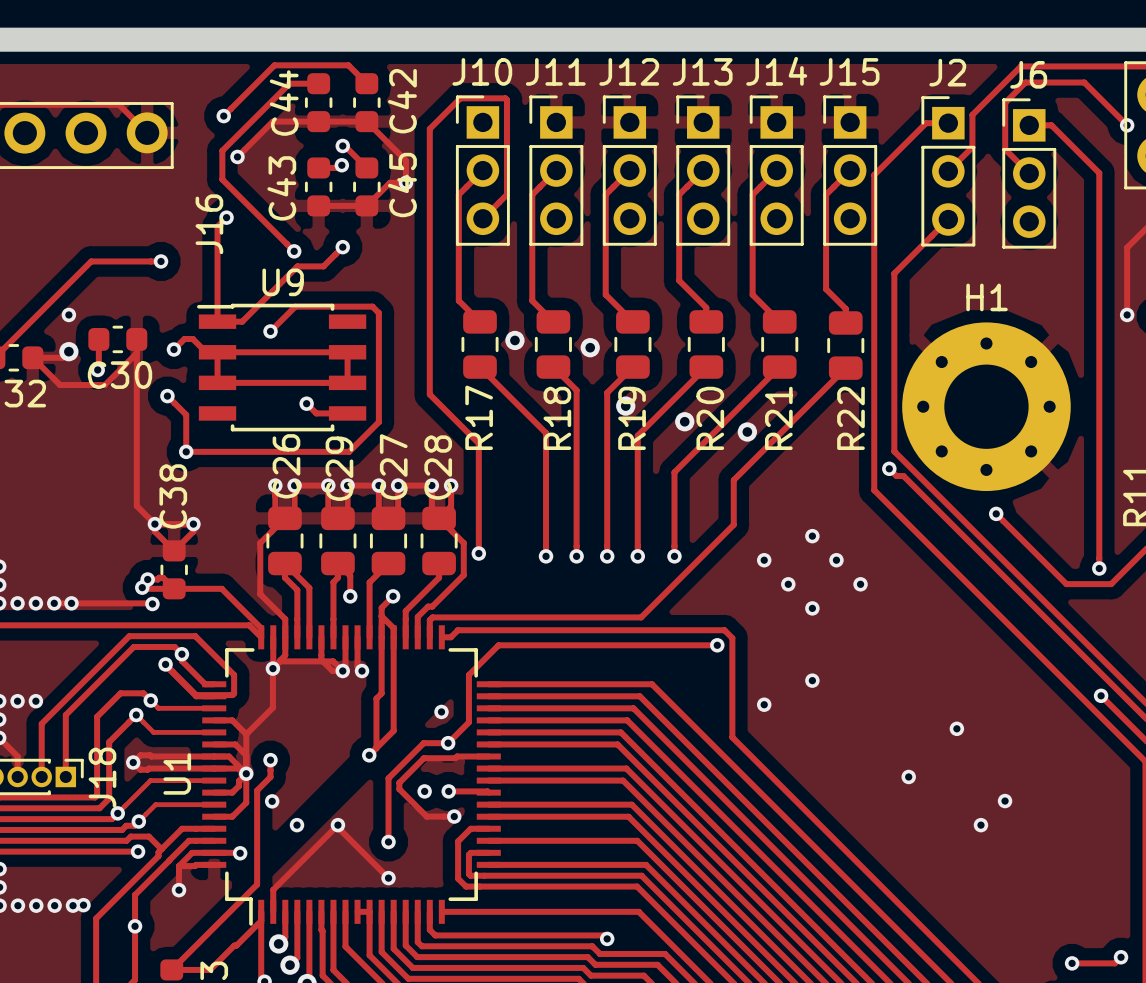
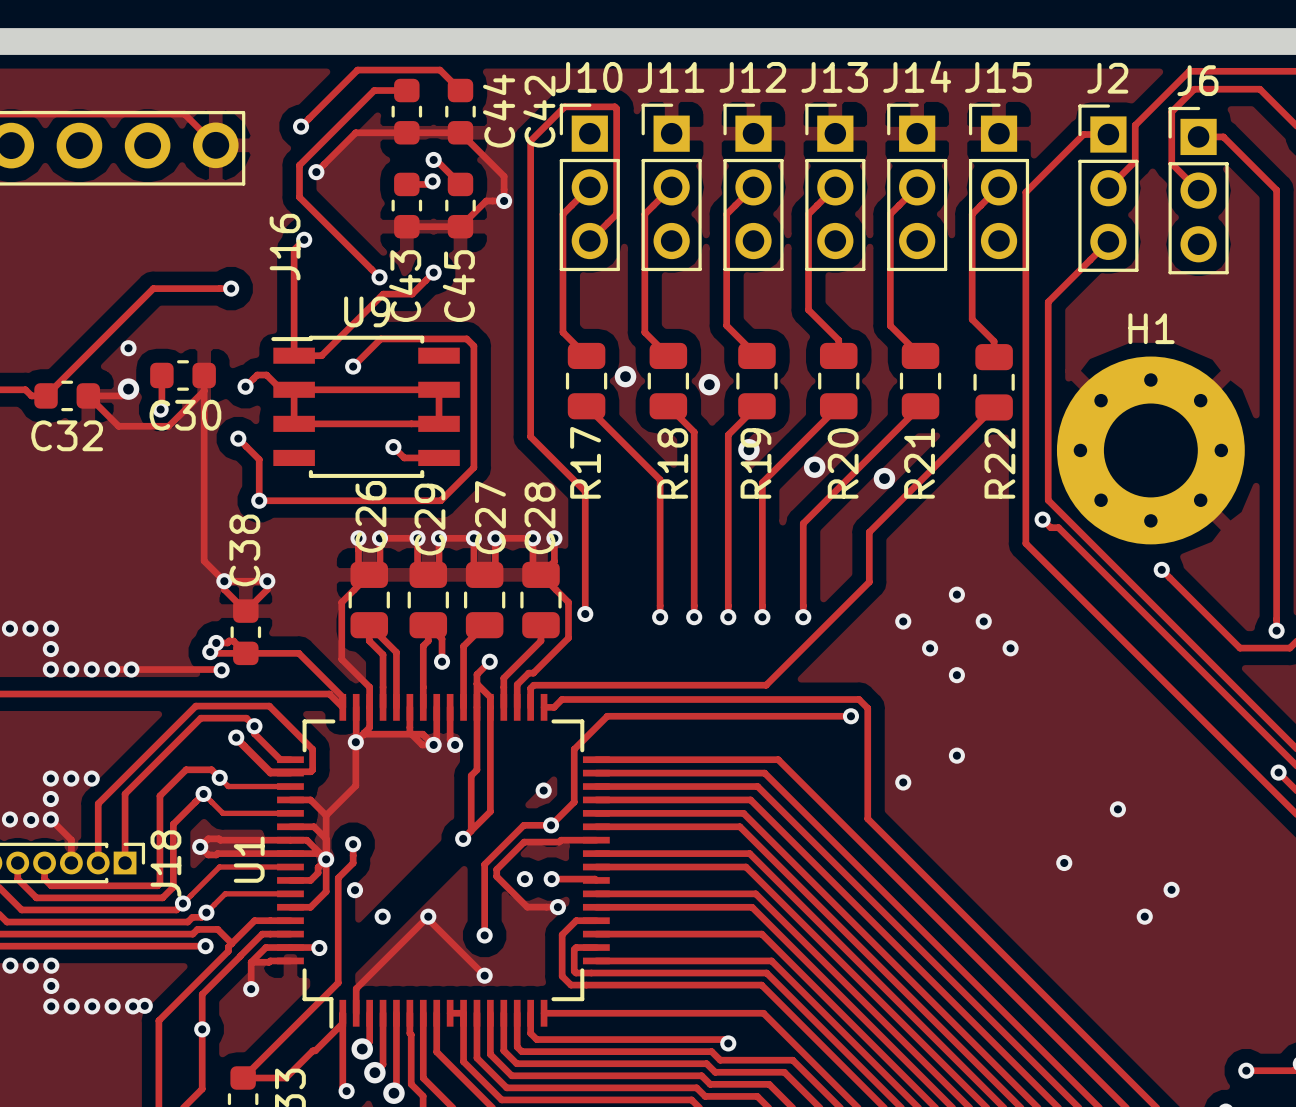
C42 name position: C42 (402, 101) -> C42 (539, 111)
C44 name position: C44 (284, 103) -> C44 (499, 111)
C45 name position: C45 (402, 185) -> C45 (458, 286)
C43 name position: C43 (281, 188) -> C43 (405, 286)

